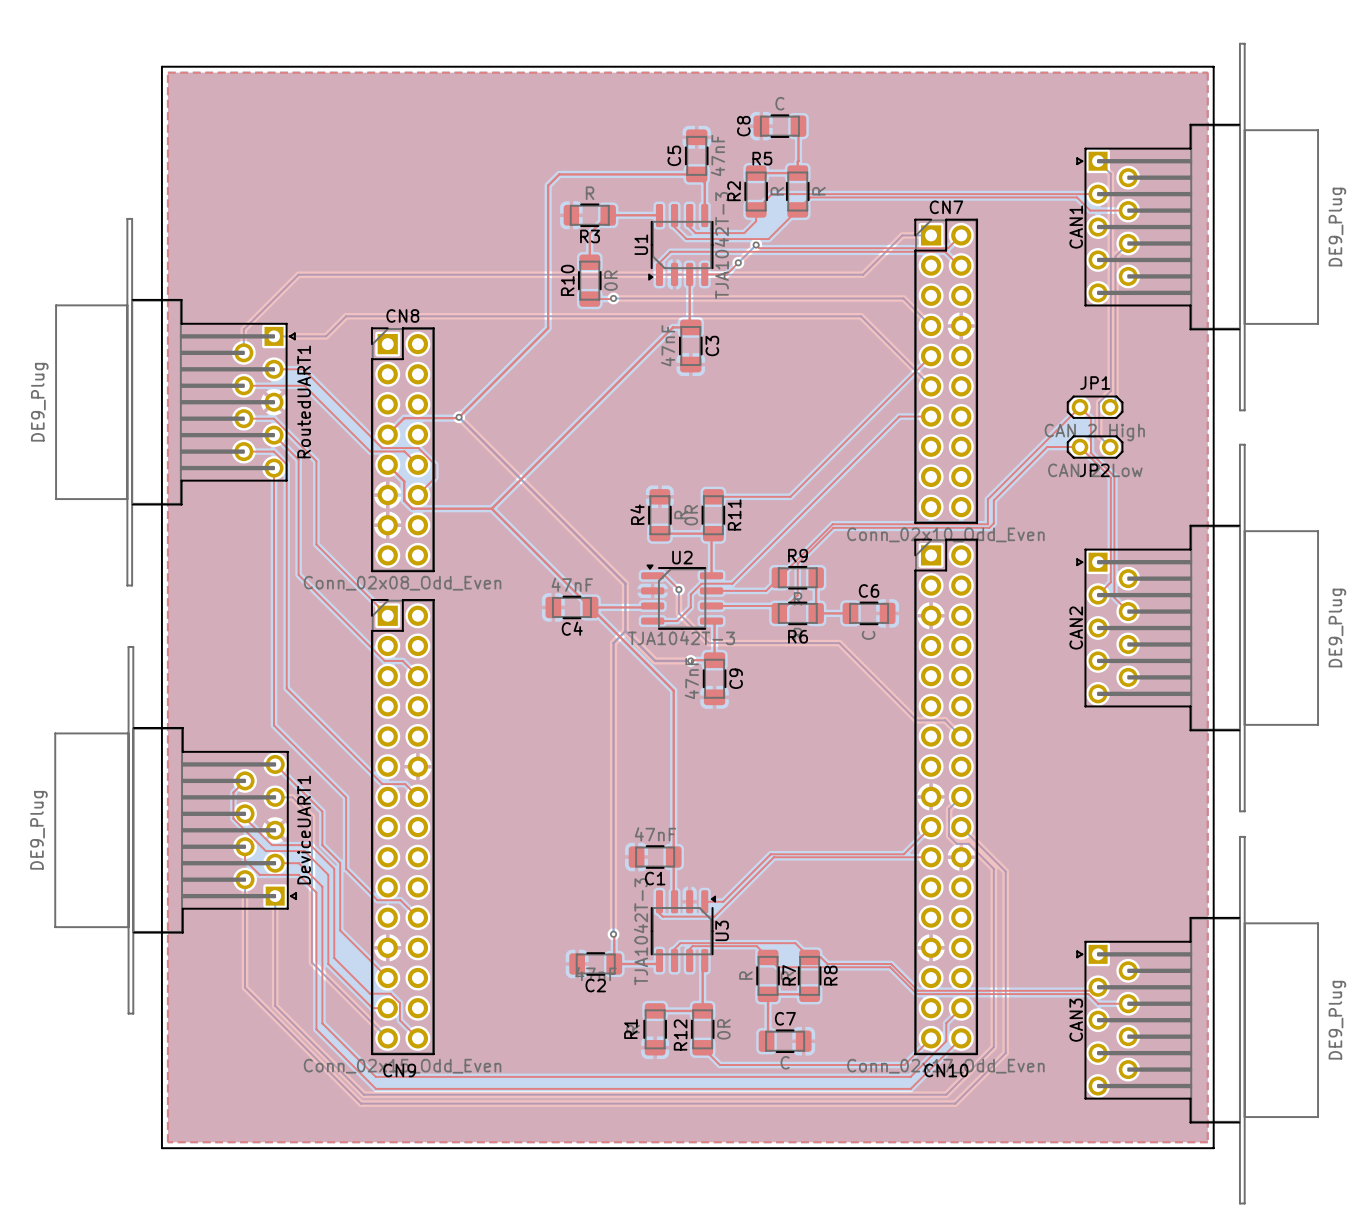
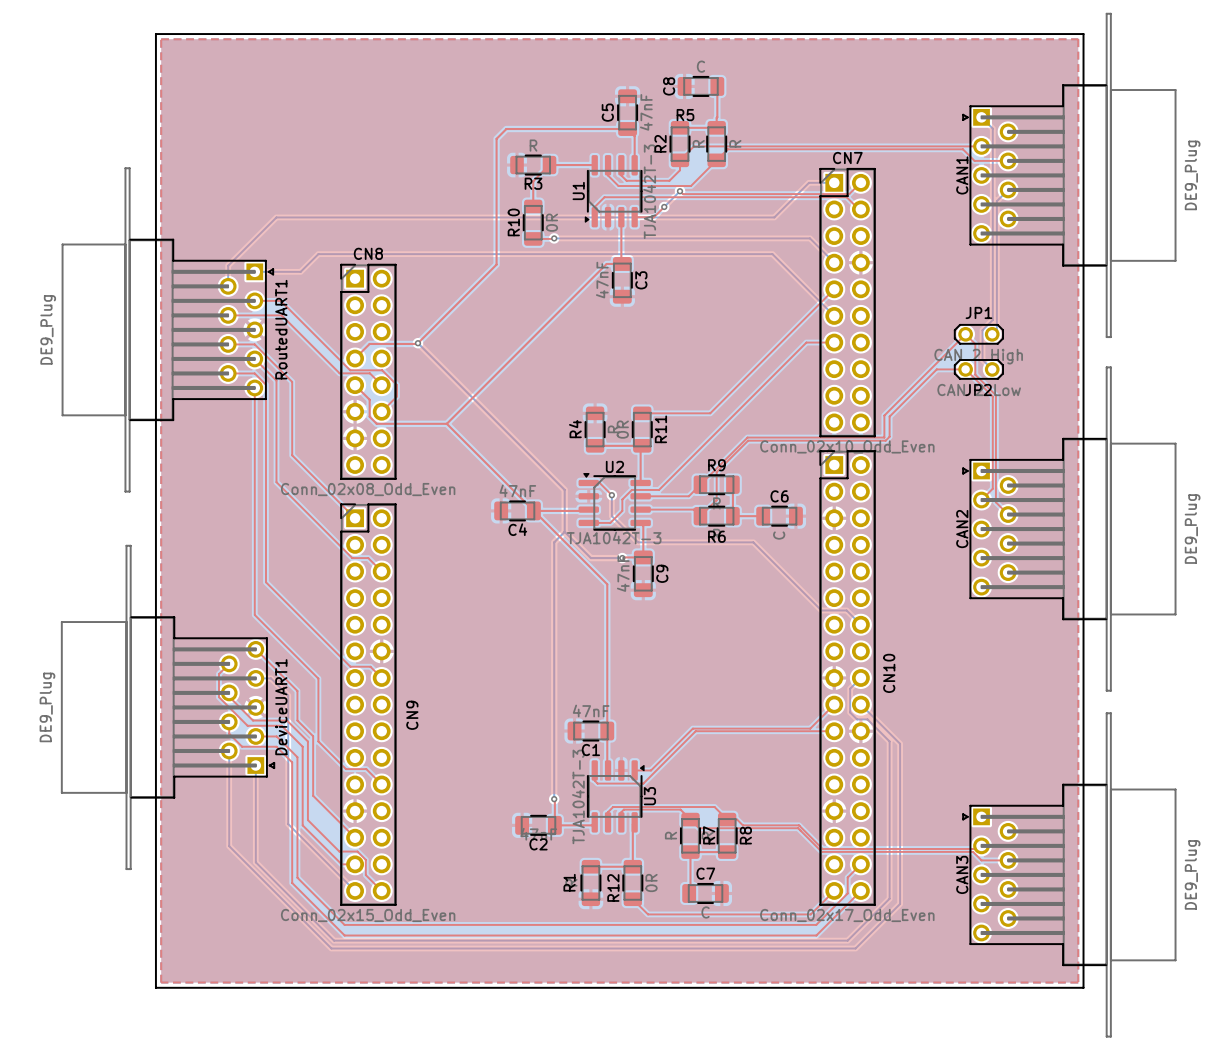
CN9 name rotation: 0° (399, 1070) -> 90° counterclockwise (412, 715)
CN9 name position: CN9 (399, 1070) -> CN9 (412, 715)
CN10 name rotation: 0° (946, 1070) -> 90° counterclockwise (889, 673)
CN10 name position: CN10 (946, 1070) -> CN10 (889, 673)

